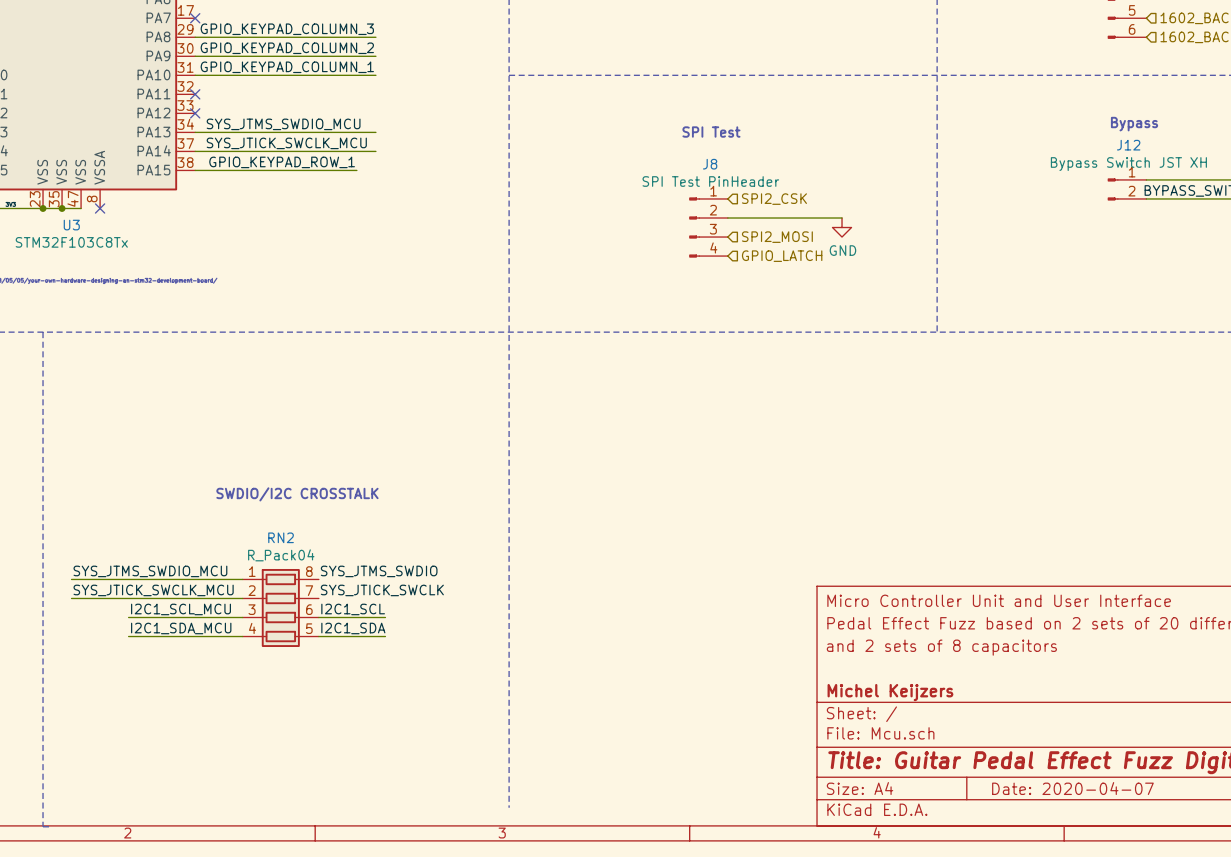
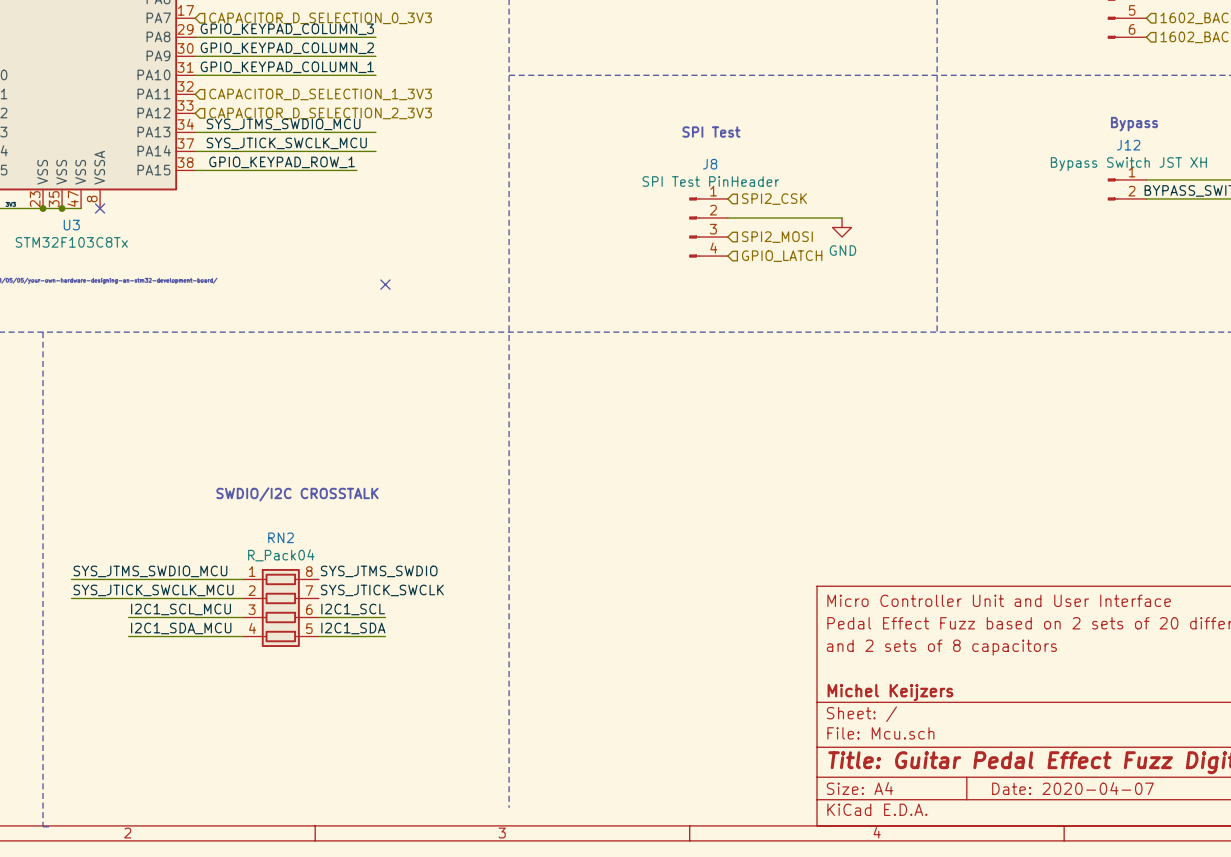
no-connect mark: (195, 18) -> none
hierarchical label: none -> CAPACITOR_D_SELECTION_0_3V3 (320, 18)
no-connect mark: (195, 94) -> none
hierarchical label: none -> CAPACITOR_D_SELECTION_1_3V3 (320, 94)
no-connect mark: (195, 113) -> none
hierarchical label: none -> CAPACITOR_D_SELECTION_2_3V3 (320, 113)
no-connect mark: none -> (385, 284)

